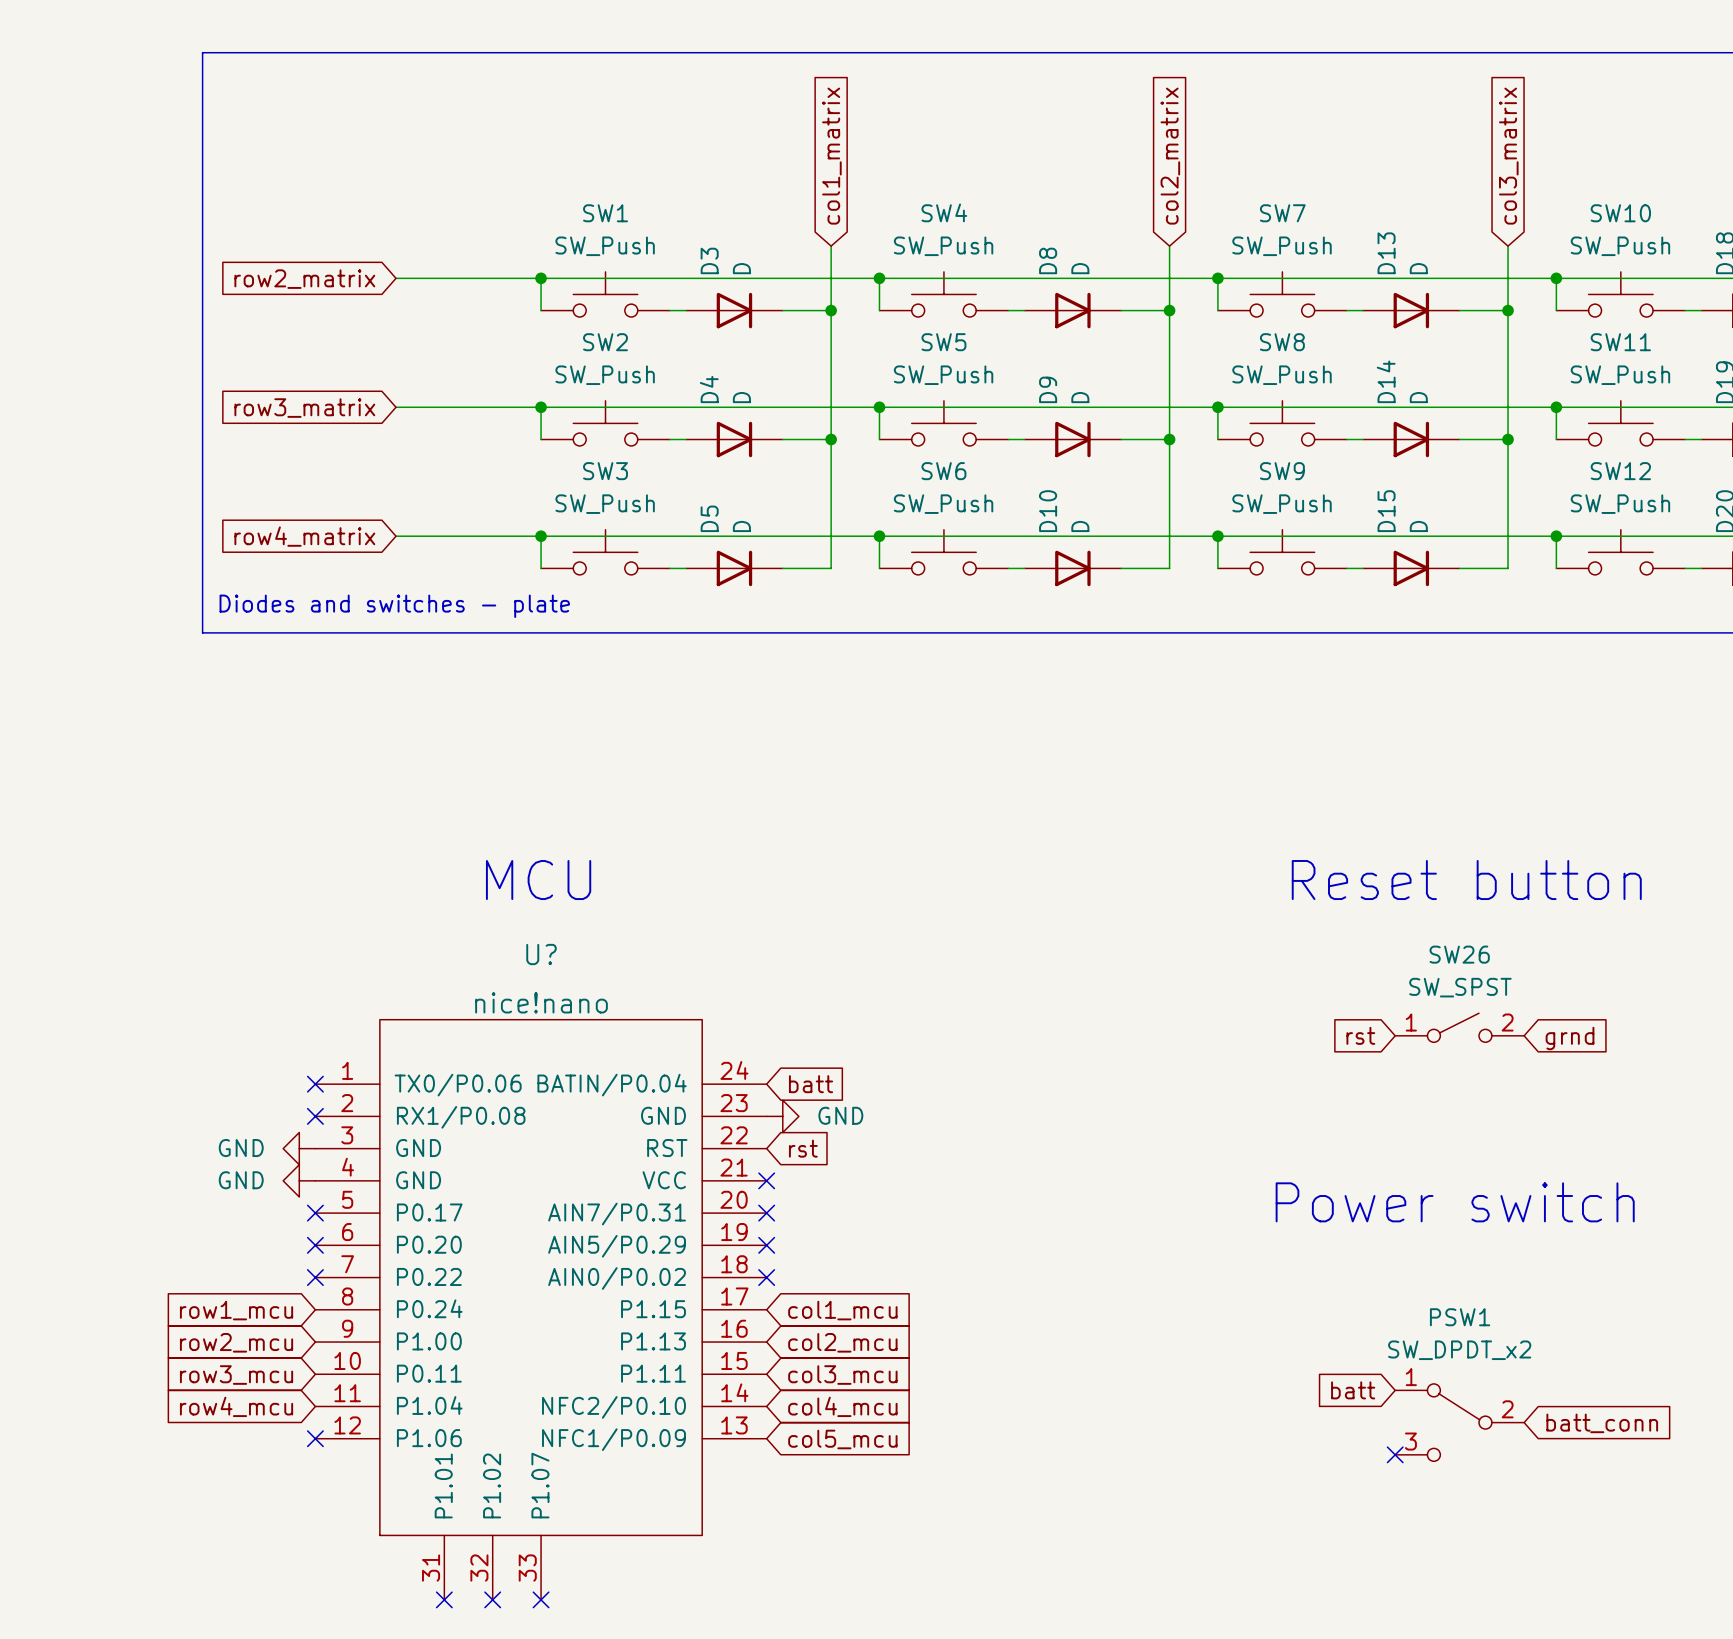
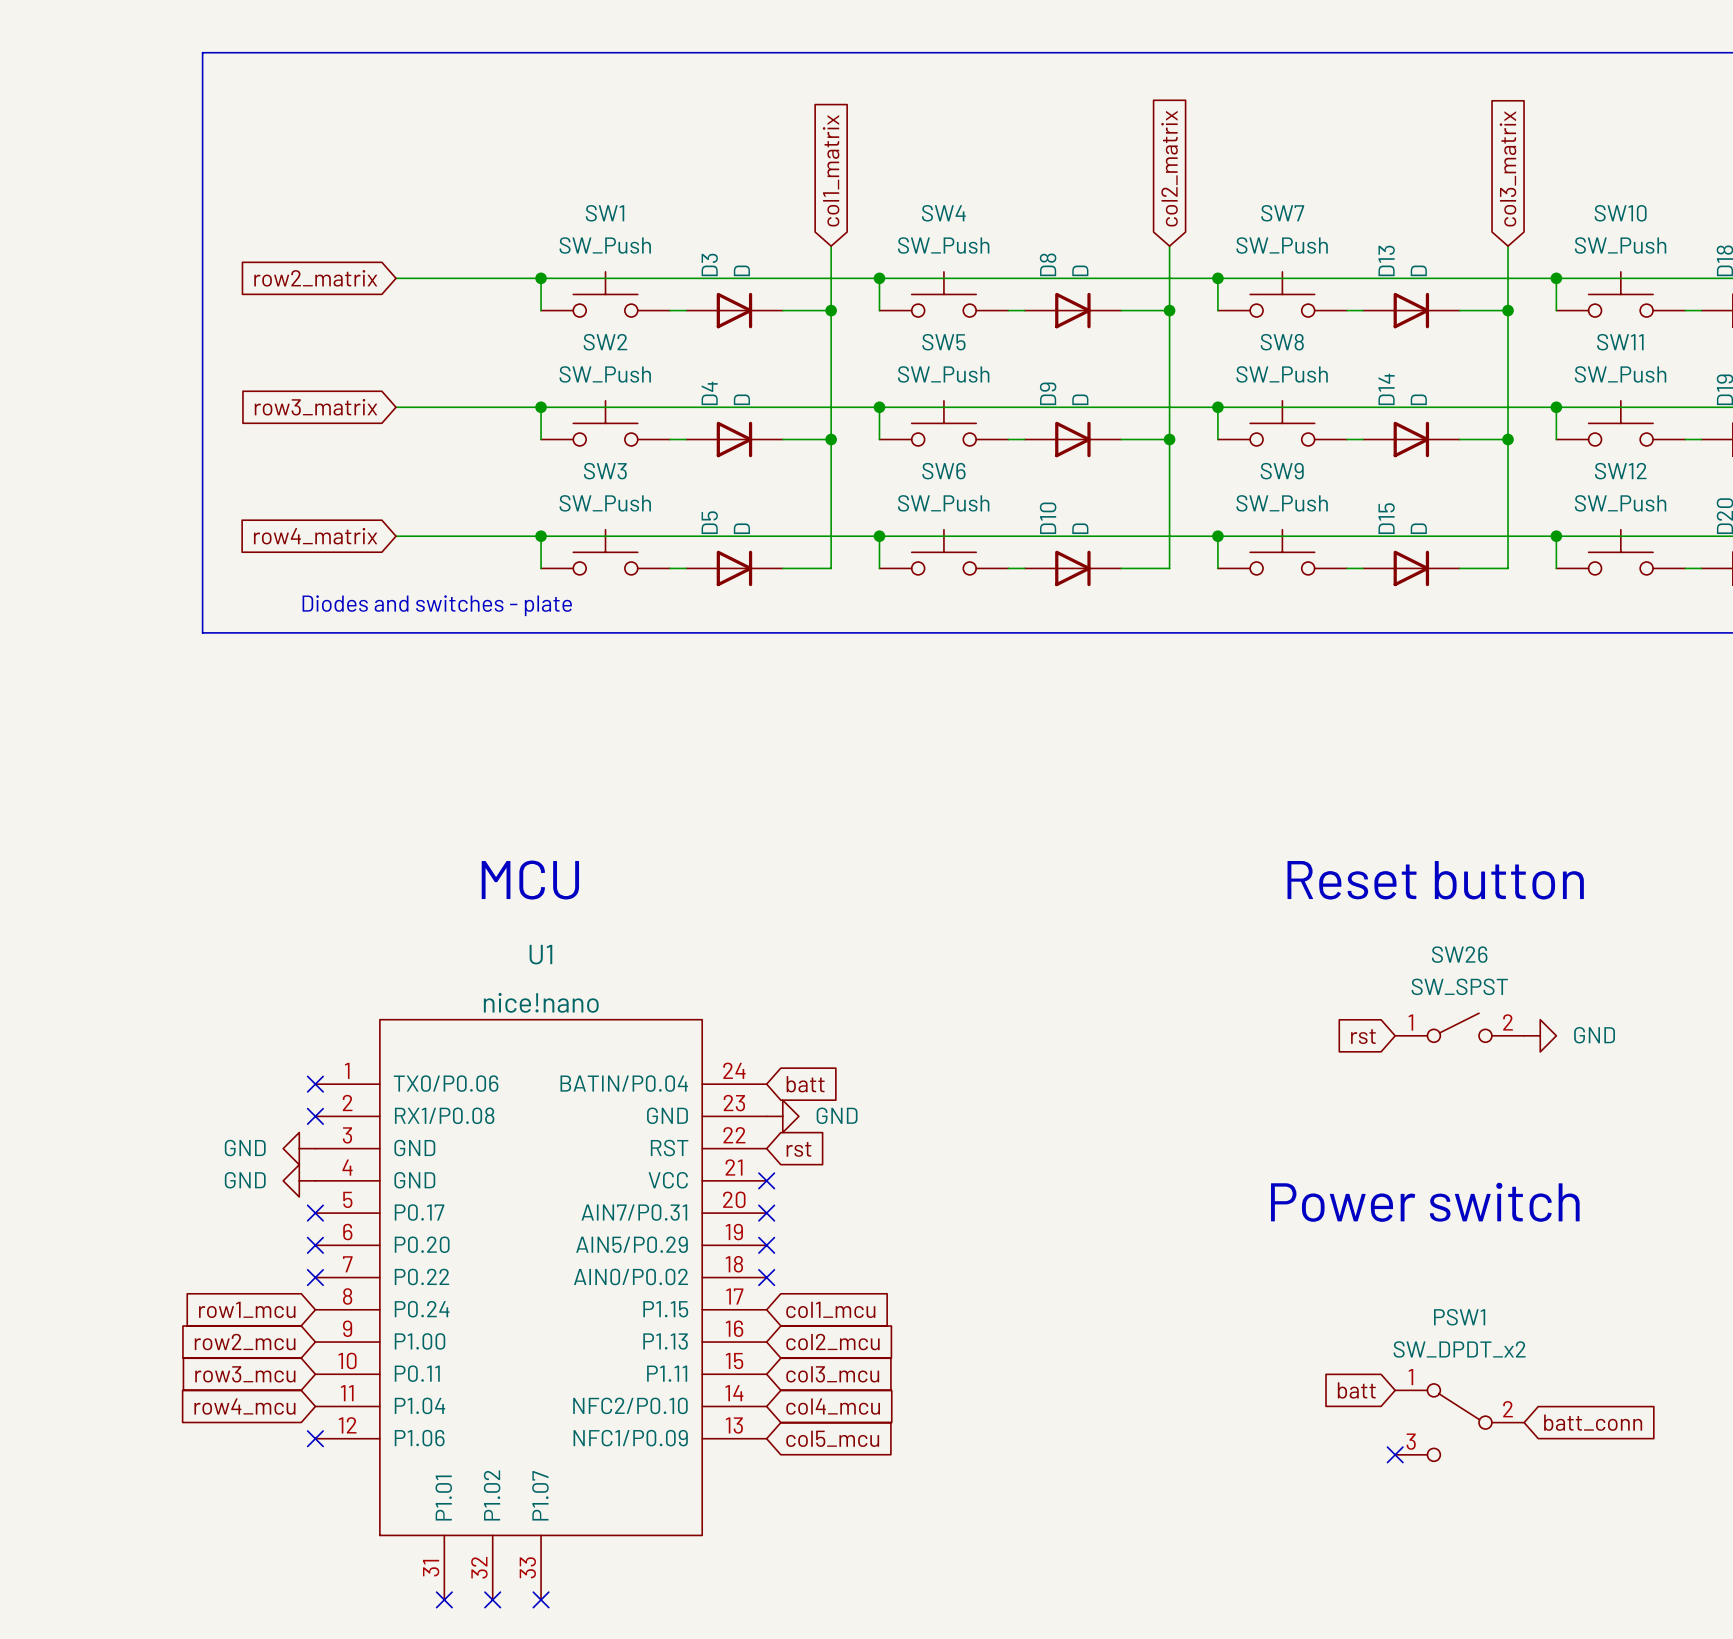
U? name: U? (541, 954) -> U1 (540, 954)
power symbol: none -> GND (1540, 1035)
global label: grnd (1570, 1038) -> none

